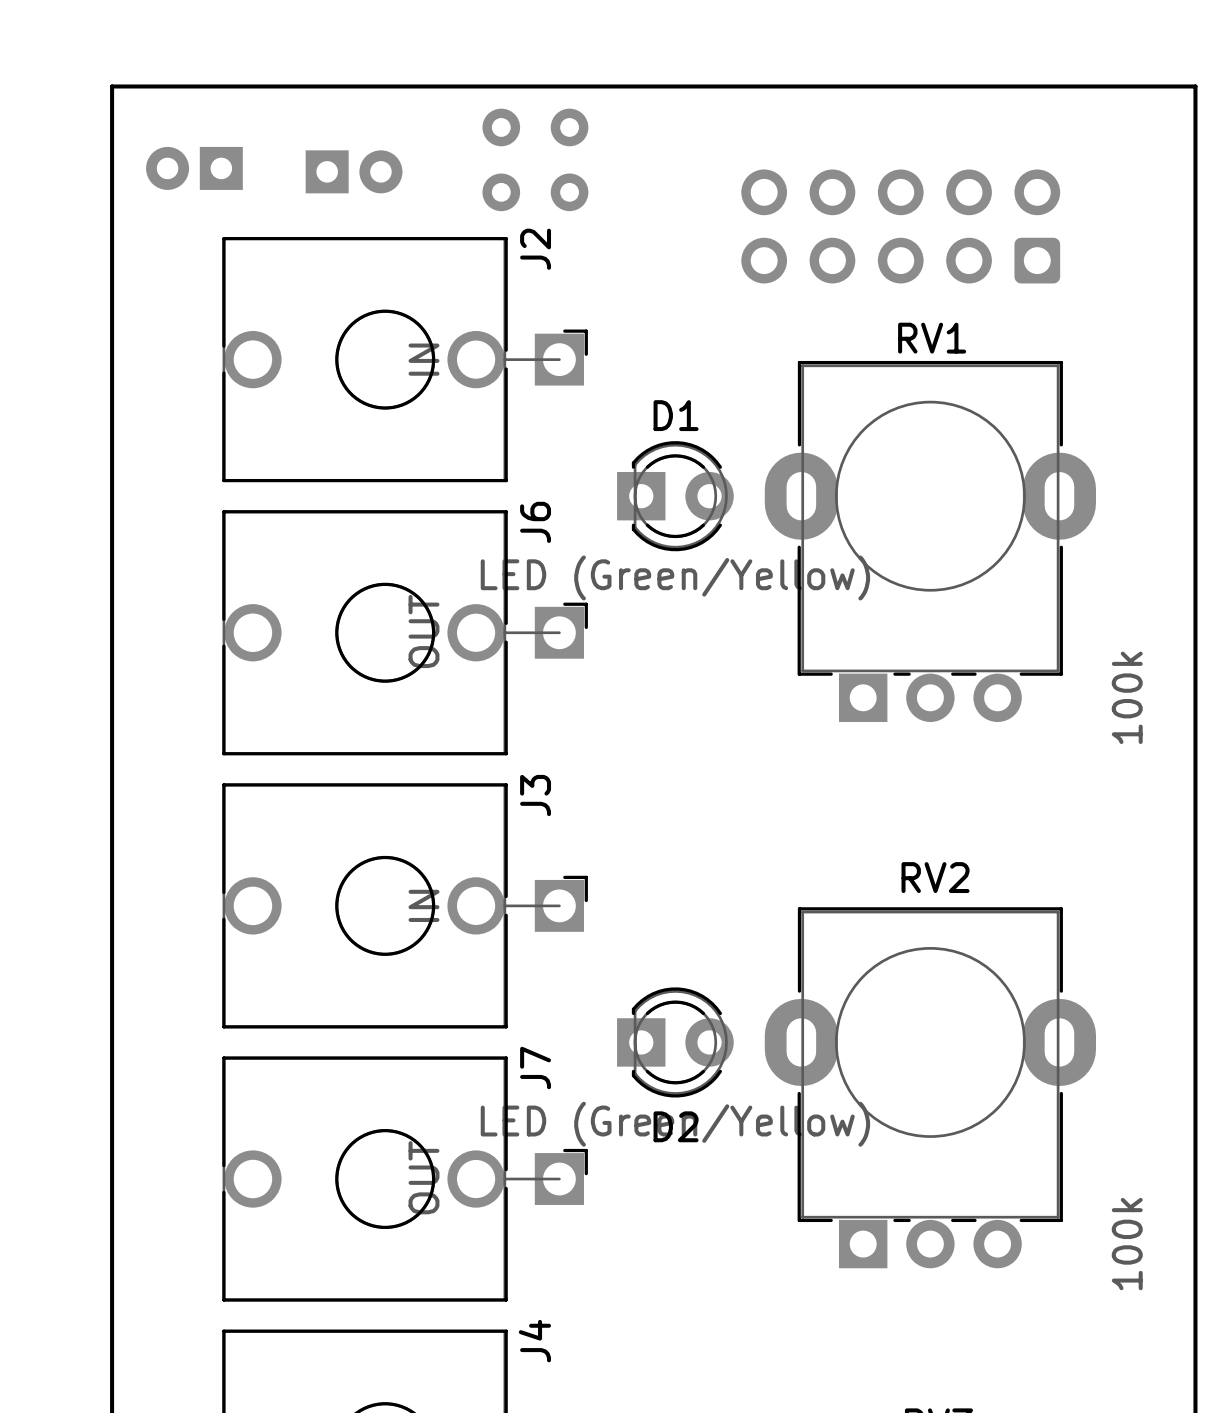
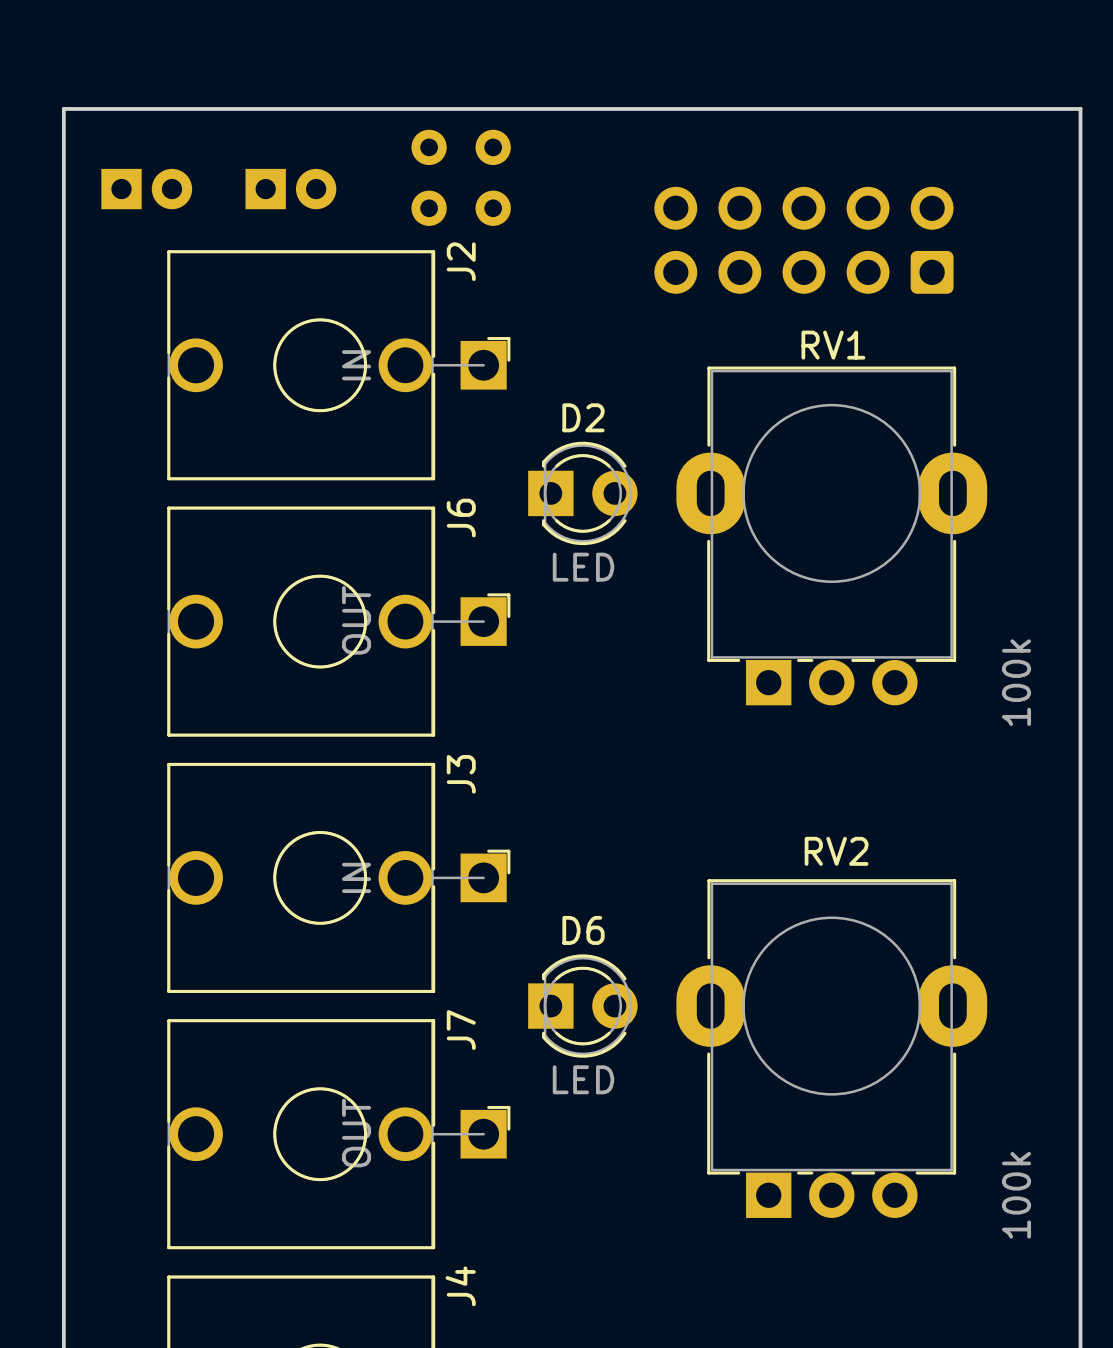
part rotation: 0° (194, 168) -> 180° (146, 189)
D1: LED (Green/Yellow) (675, 496) -> none
D6: none -> LED (582, 1006)
D2 position: (675, 1042) -> (582, 493)
D2 value: LED (Green/Yellow) (675, 1124) -> LED (583, 567)
D2 name position: D2 (676, 1126) -> D2 (583, 417)

